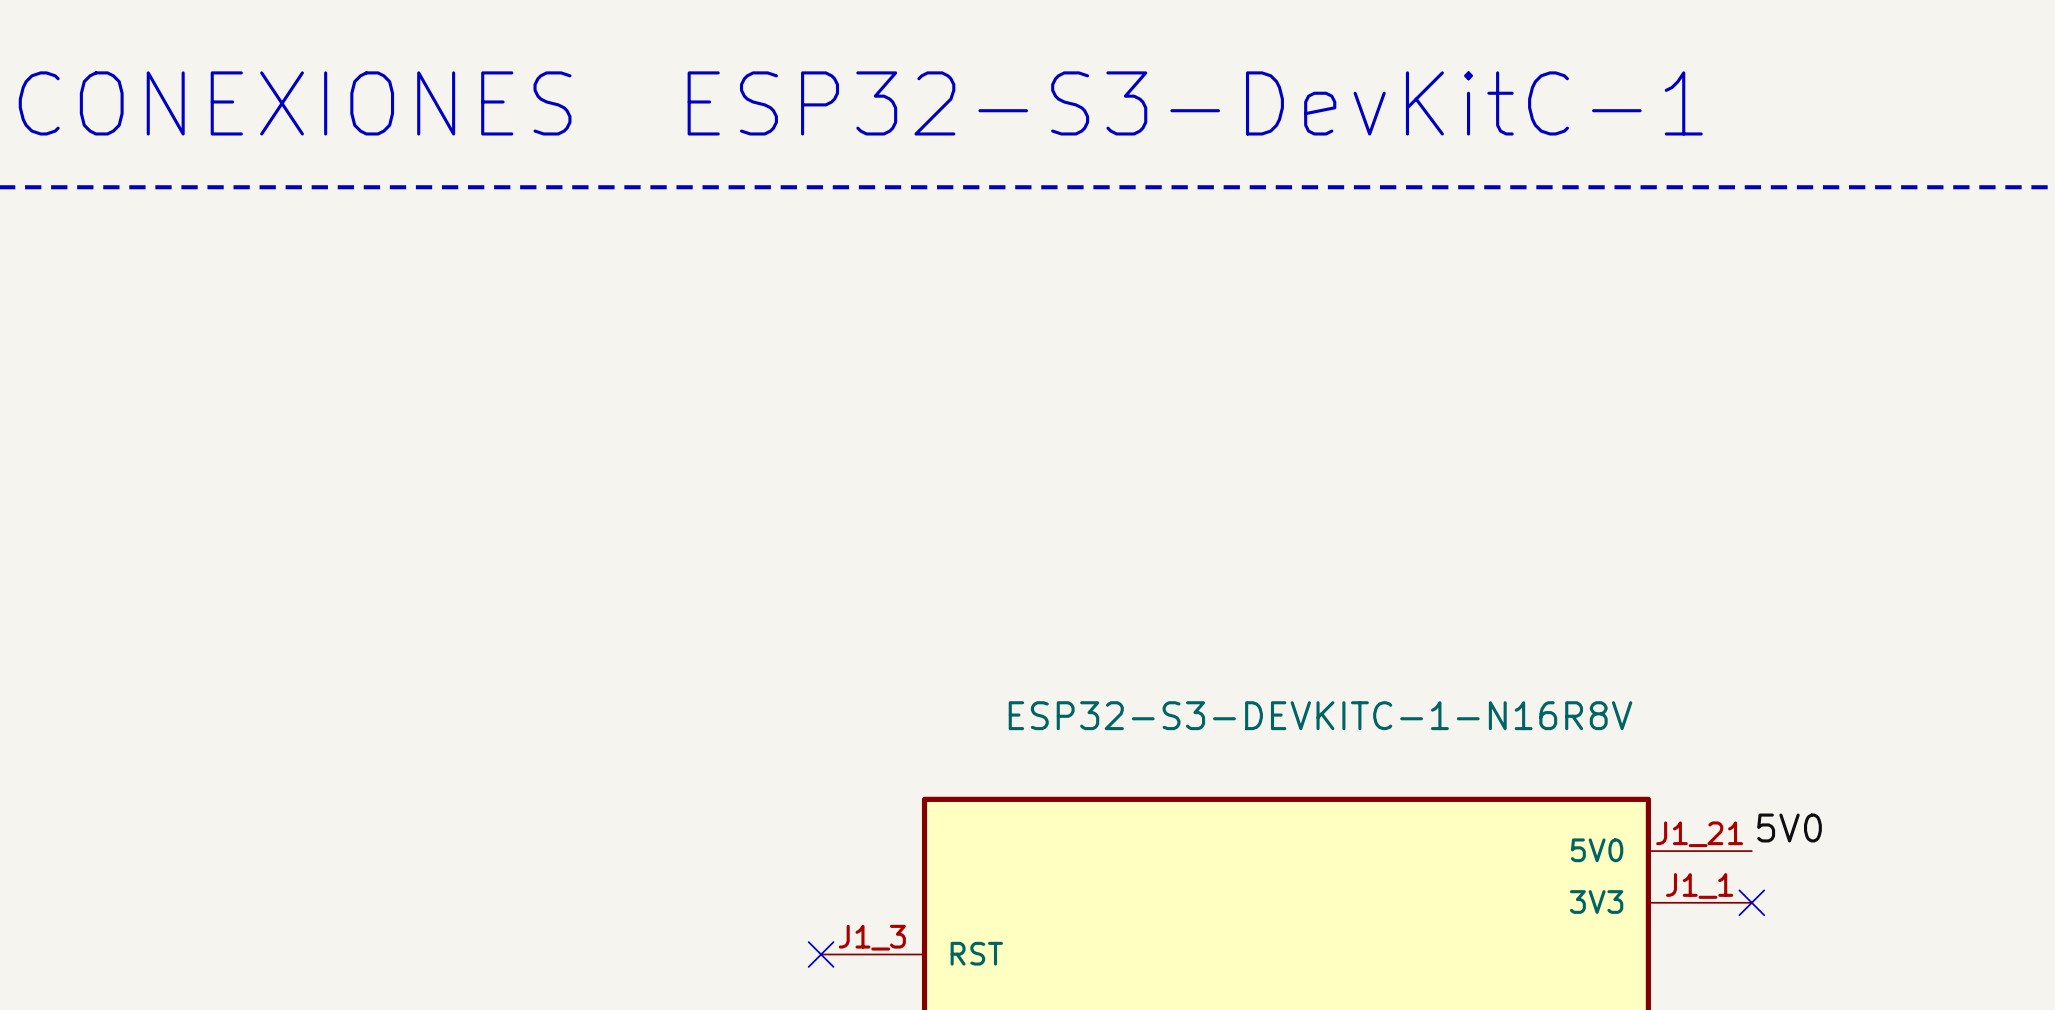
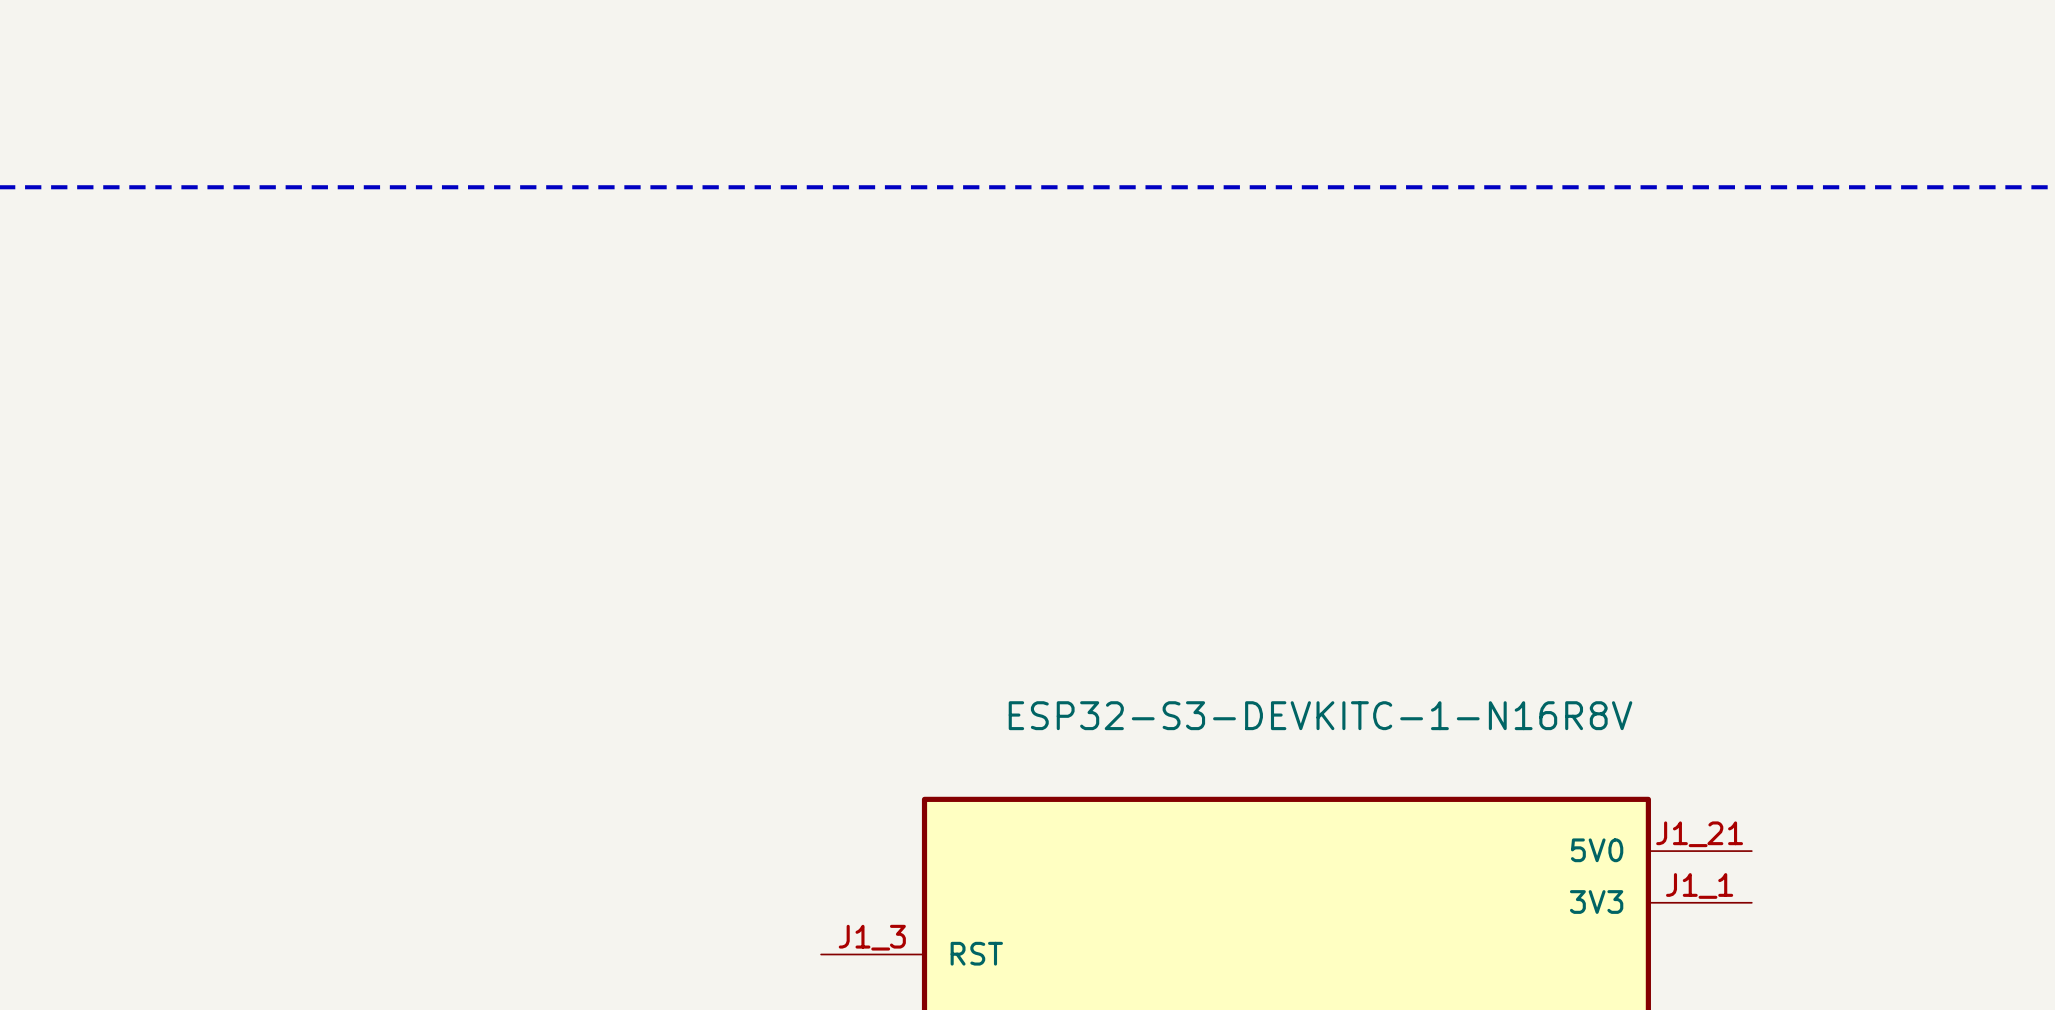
text: CONEXIONES ESP32-S3-DevKitC-1 (860, 103) -> none
label: 5V0 (1789, 828) -> none
no-connect mark: (1751, 902) -> none
no-connect mark: (821, 954) -> none

